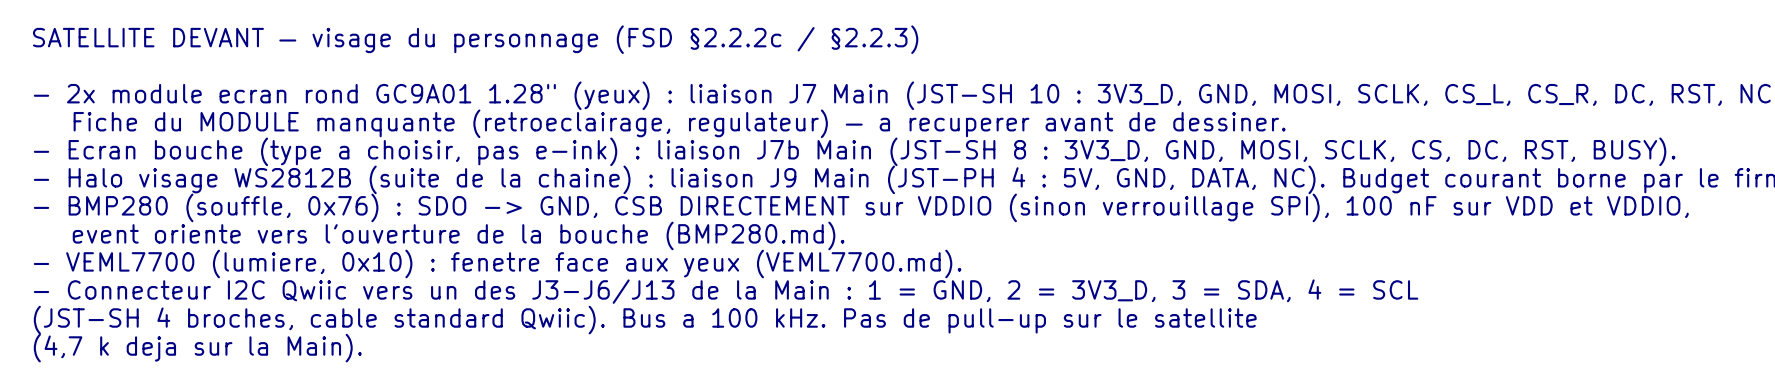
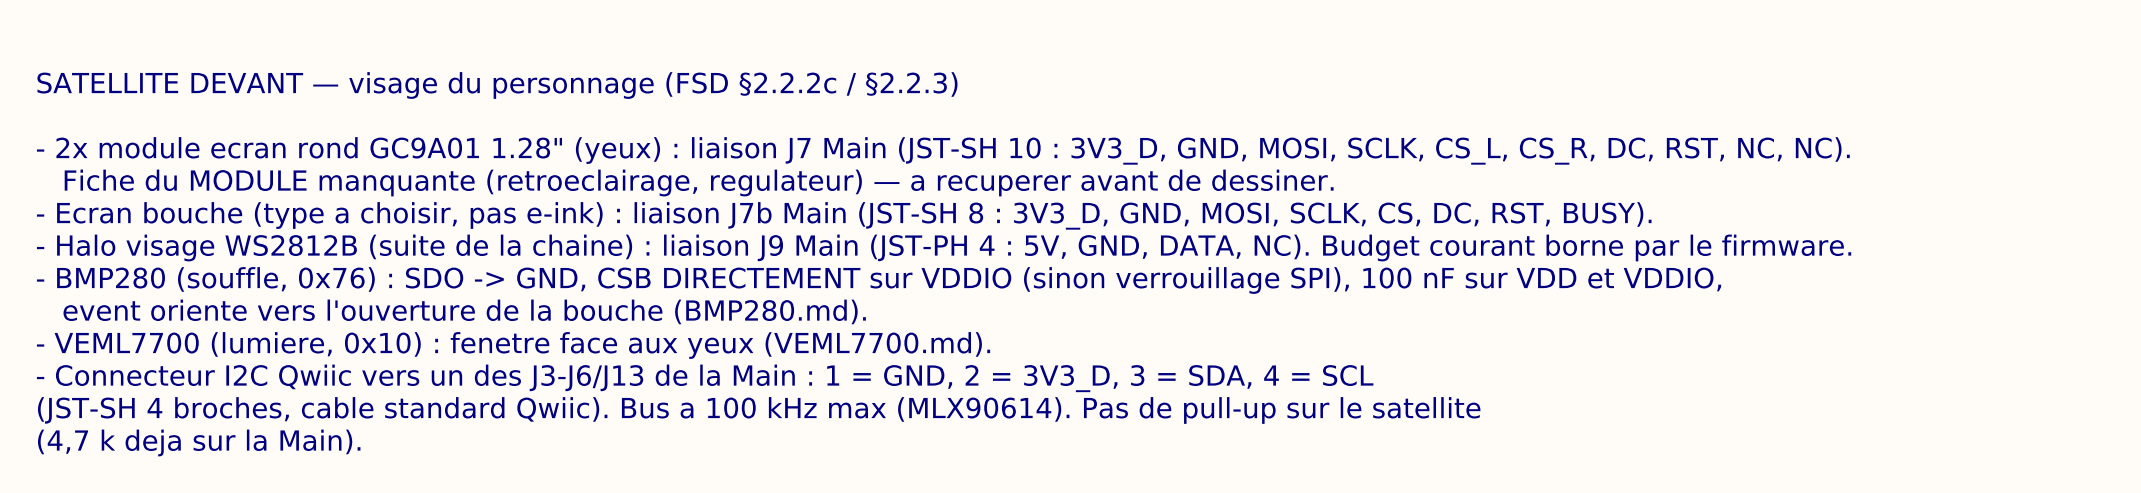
text: (JST-SH 4 broches, cable standard Qwiic). Bus a 100 kHz. Pas de pull-up sur le satellite (645, 320) -> (JST-SH 4 broches, cable standard Qwiic). Bus a 100 kHz max (MLX90614). Pas de pull-up sur le satellite (759, 410)

